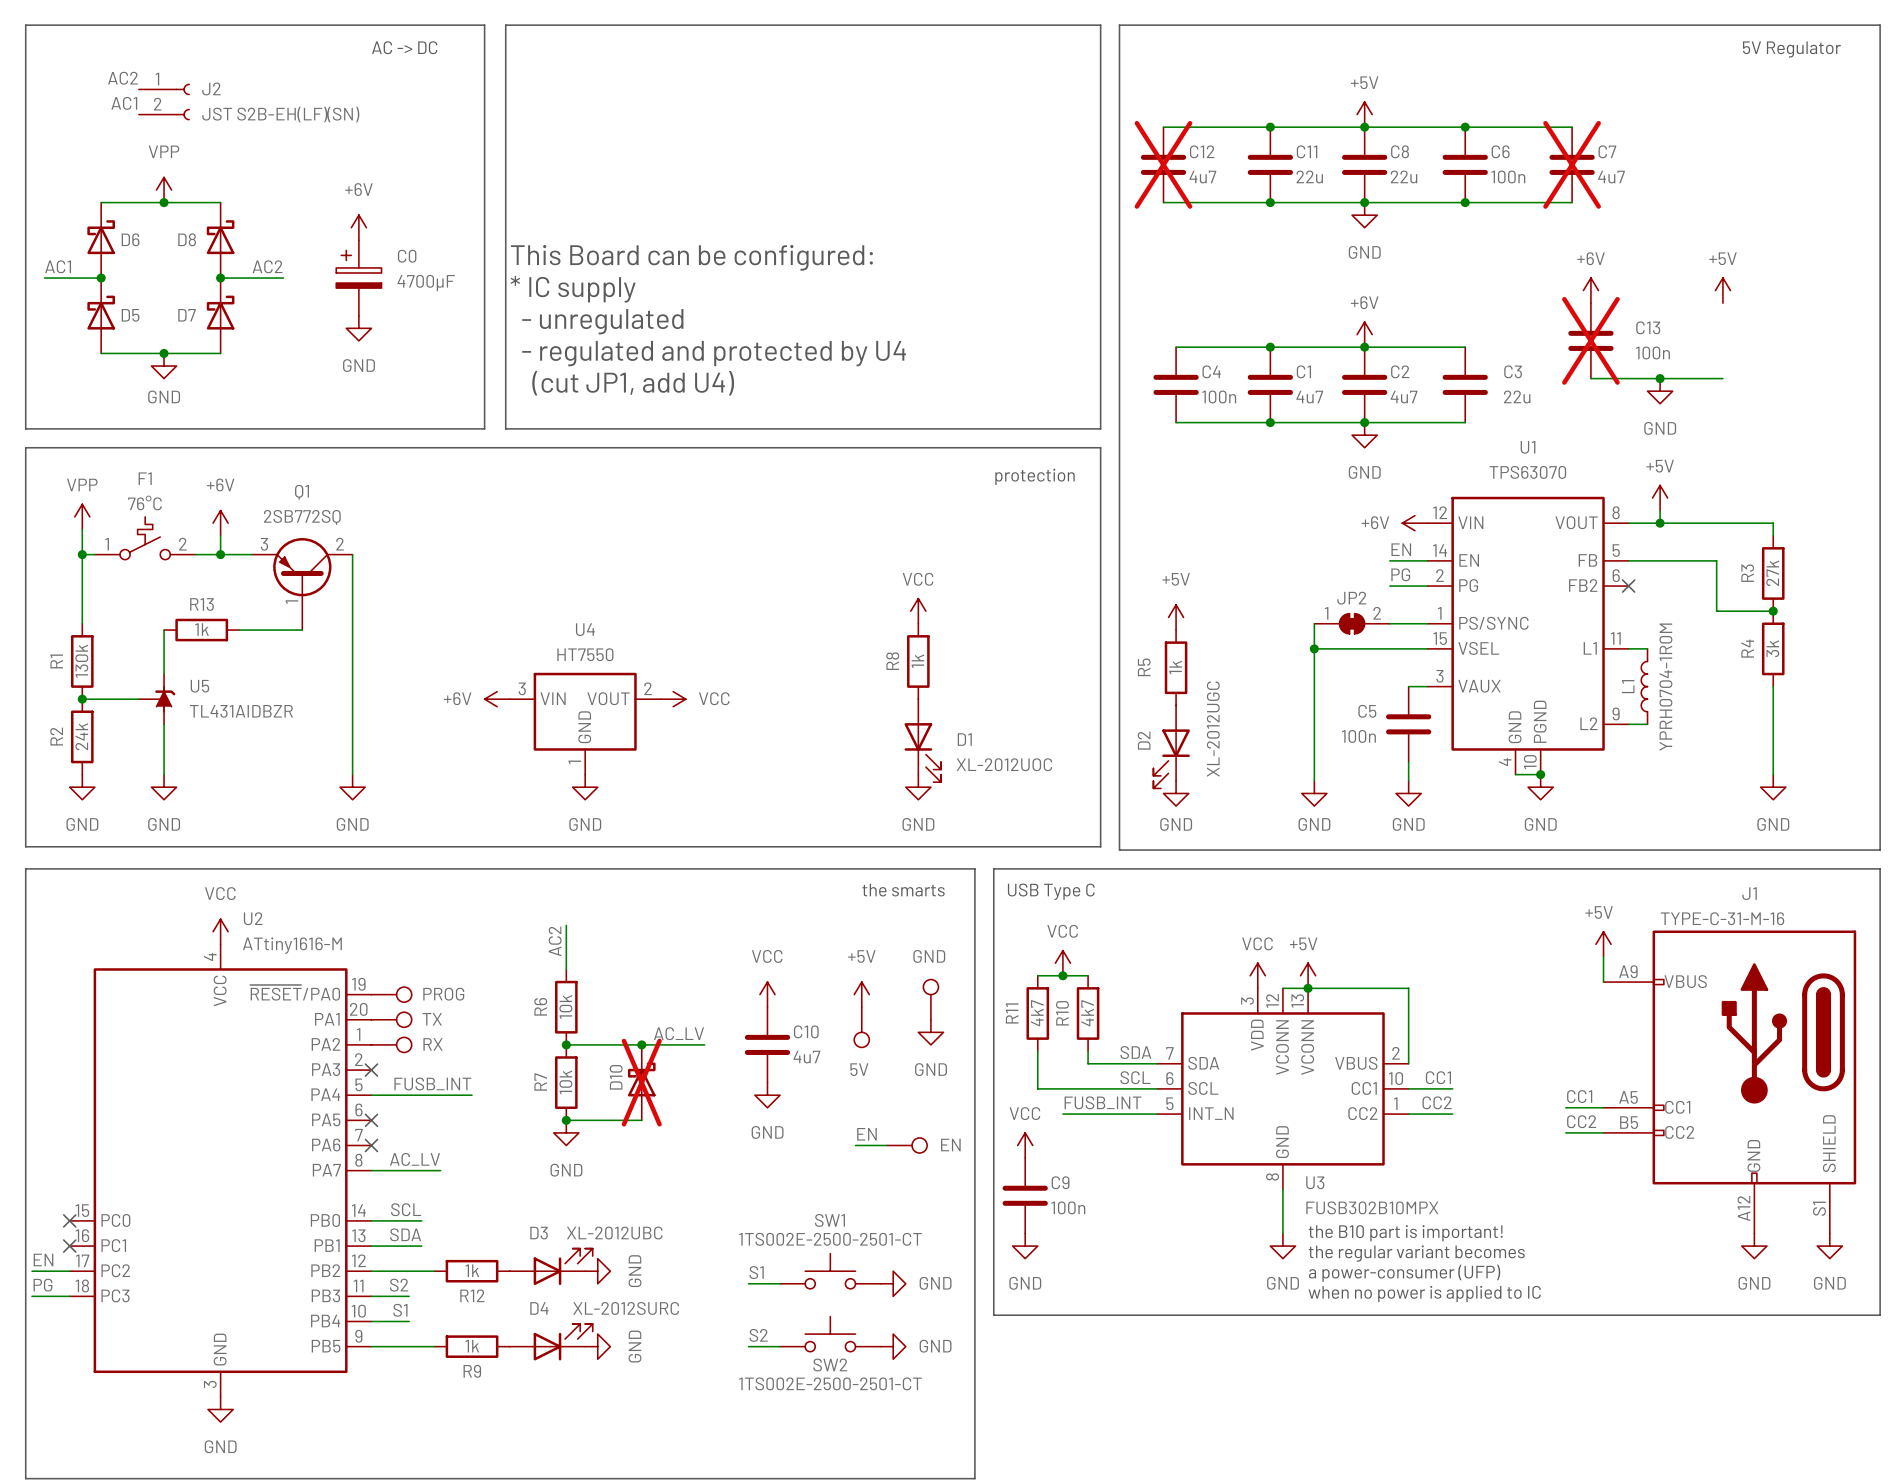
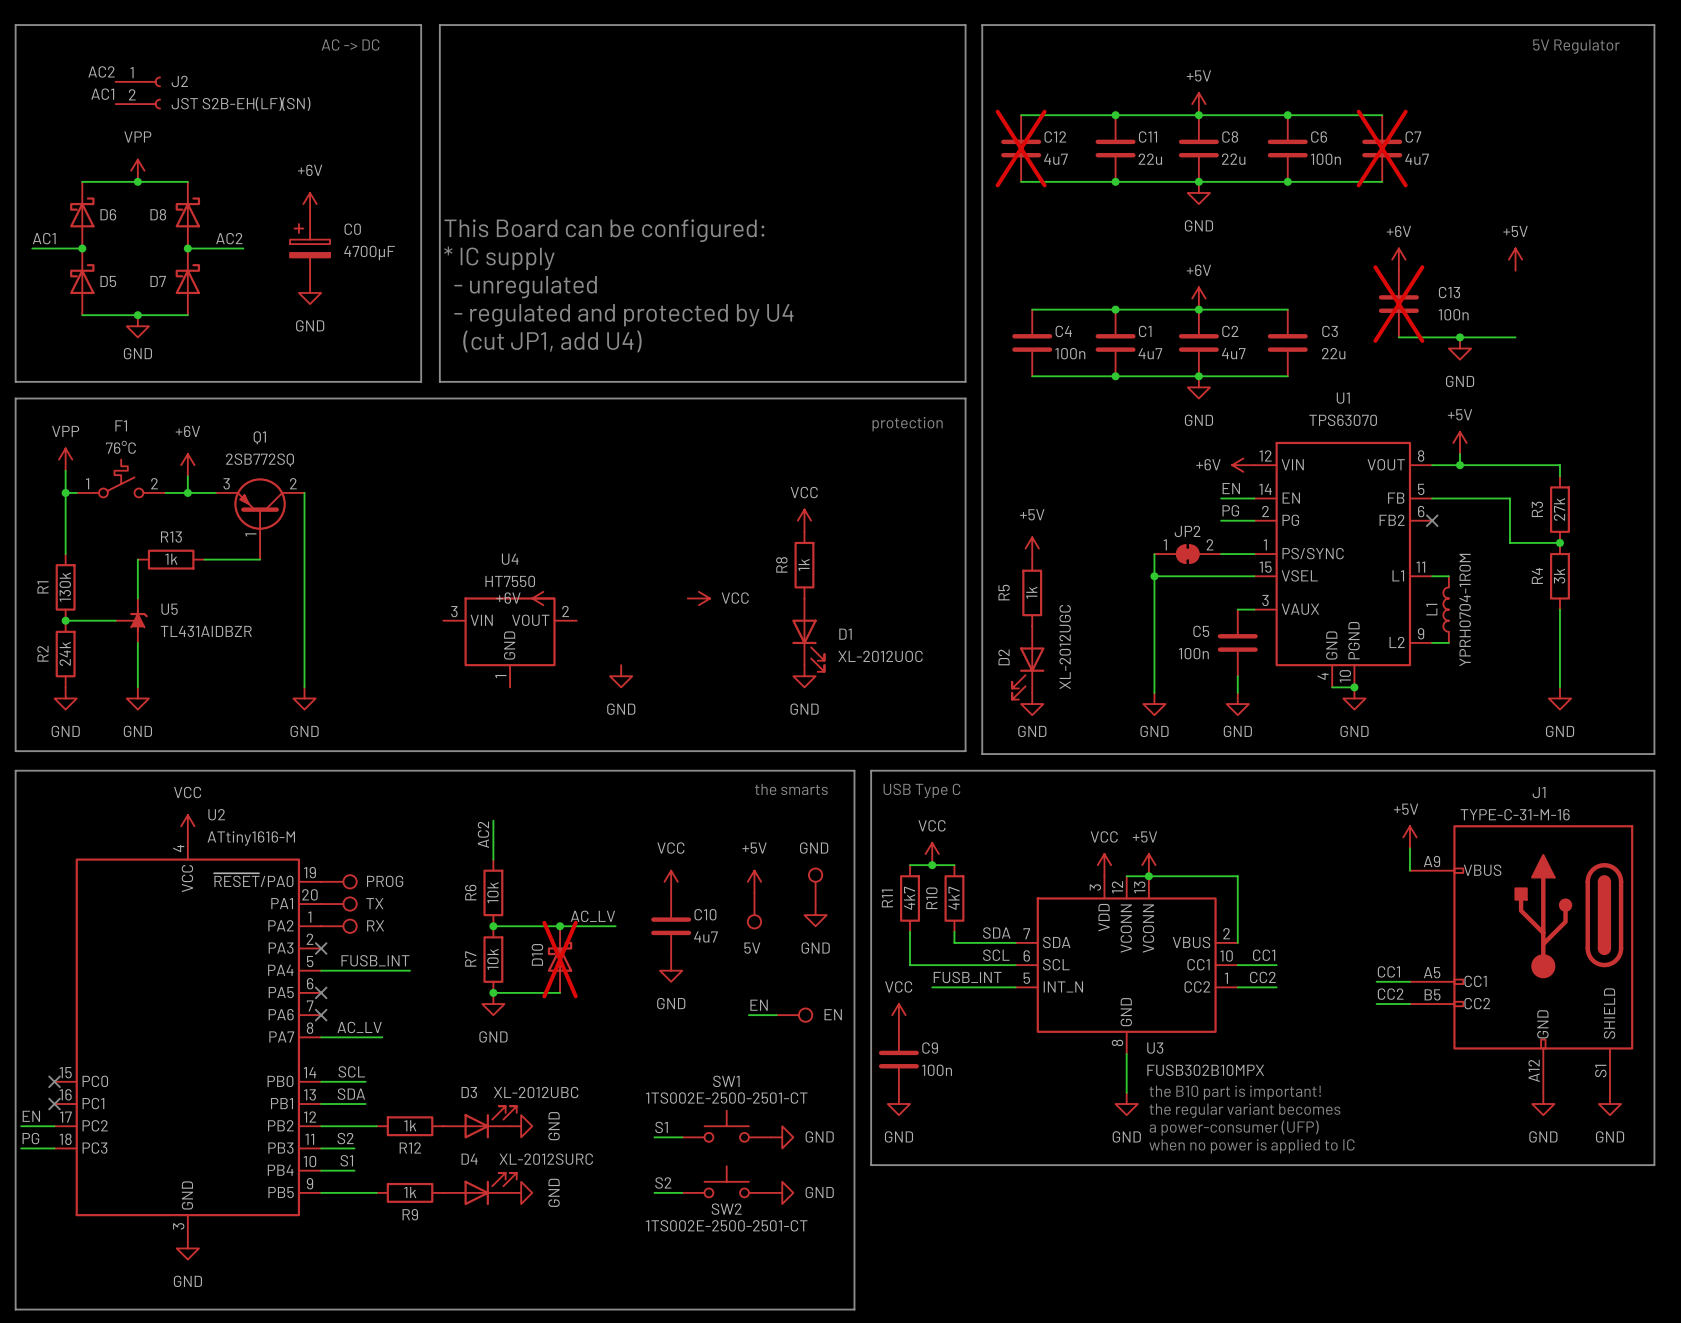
power symbol position: VCC (918, 611) -> VCC (804, 520)
R8 position: (918, 661) -> (804, 565)
power symbol: none -> VCC (698, 598)
power symbol position: +6V (497, 699) -> +6V (543, 598)
power symbol: VCC (673, 699) -> none
D1 position: (922, 740) -> (808, 635)
power symbol: none -> GND (621, 676)
power symbol: GND (585, 787) -> none
power symbol position: GND (918, 787) -> GND (804, 676)

